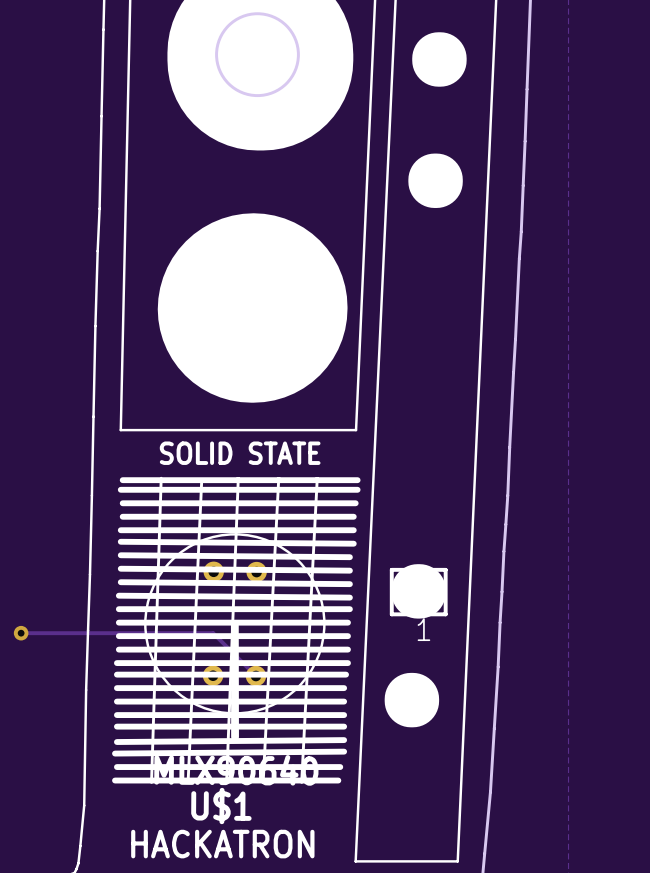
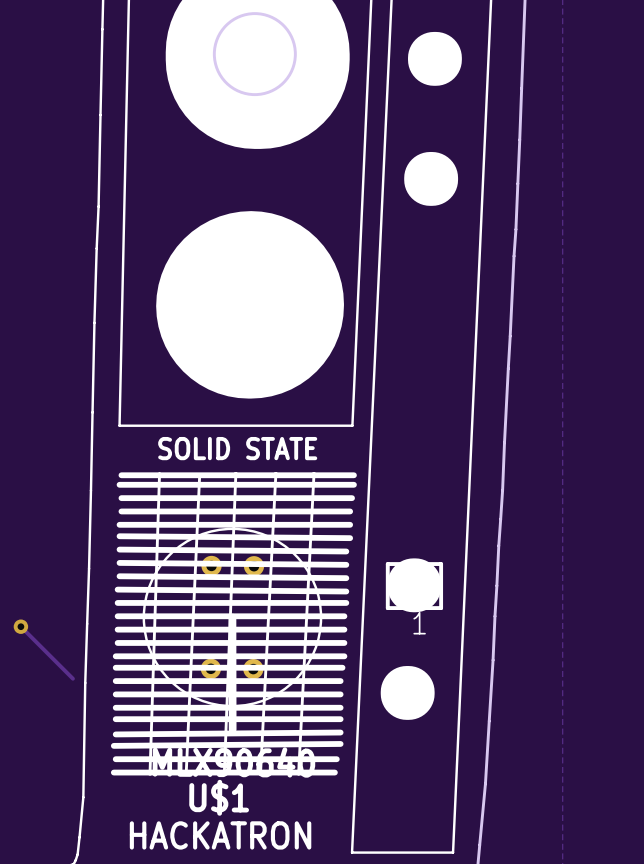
track: (21, 633) (213, 633) (255, 676) -> (20, 626) (72, 678)

